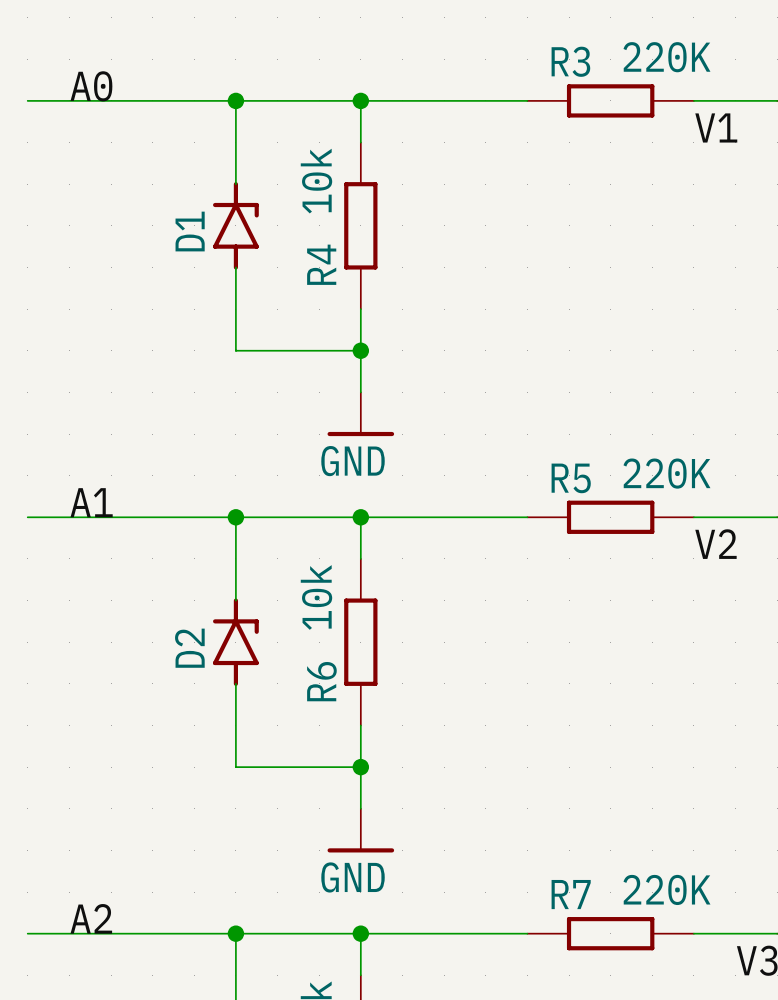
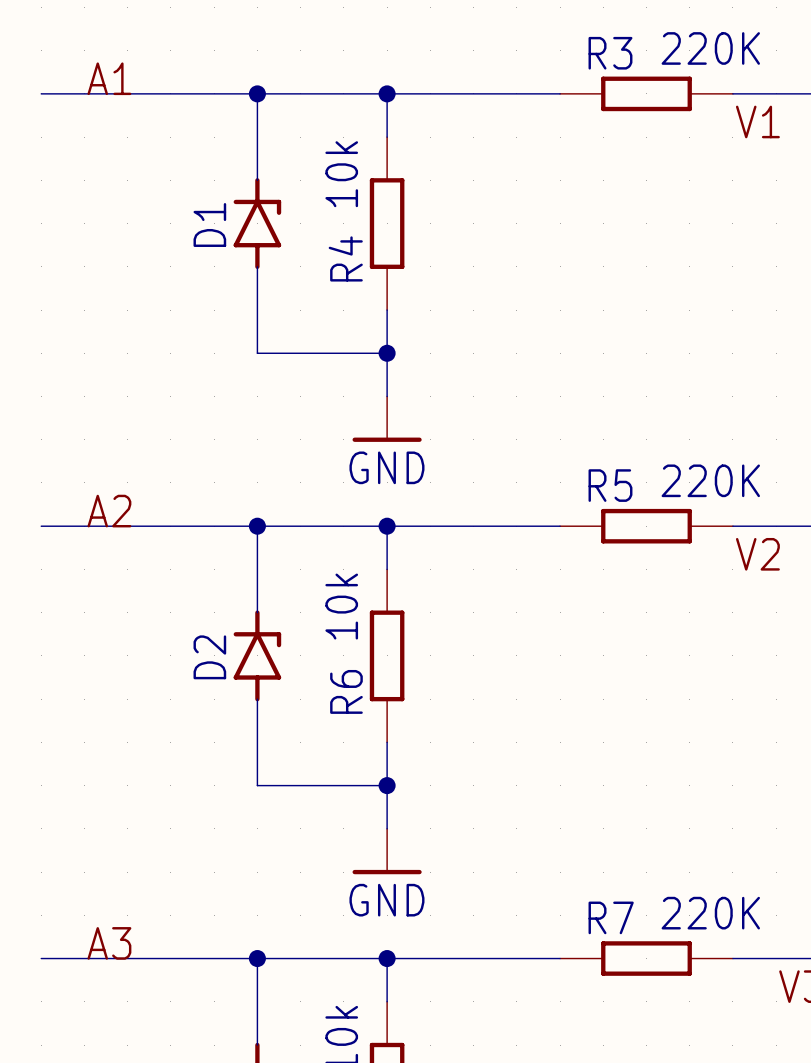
label: A0 (91, 86) -> A1 (109, 78)
label: A1 (91, 502) -> A2 (109, 511)
label: A2 (91, 918) -> A3 (109, 943)

